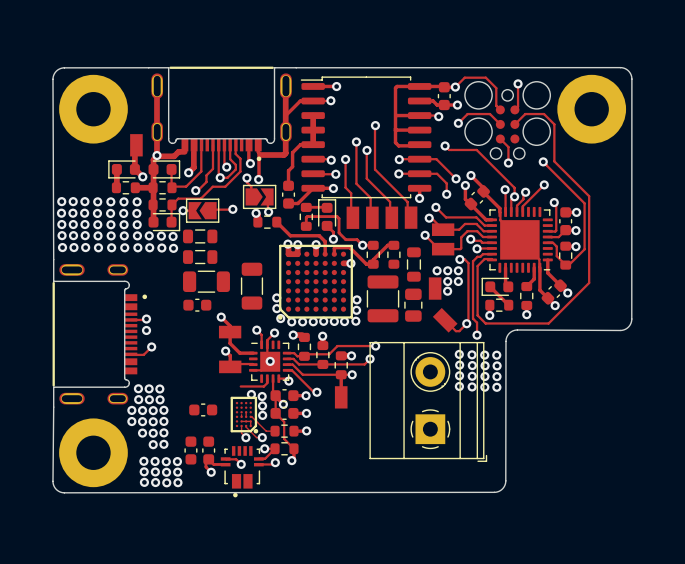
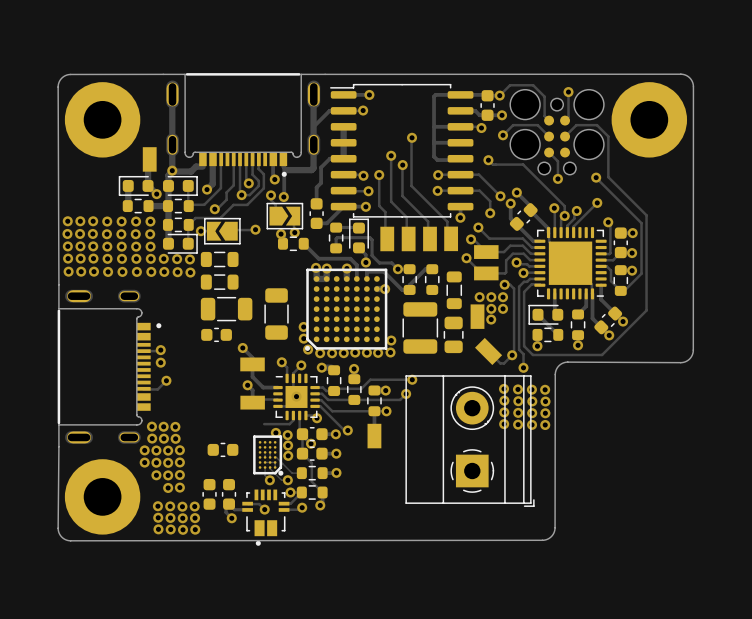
via: (356, 299) -> none

